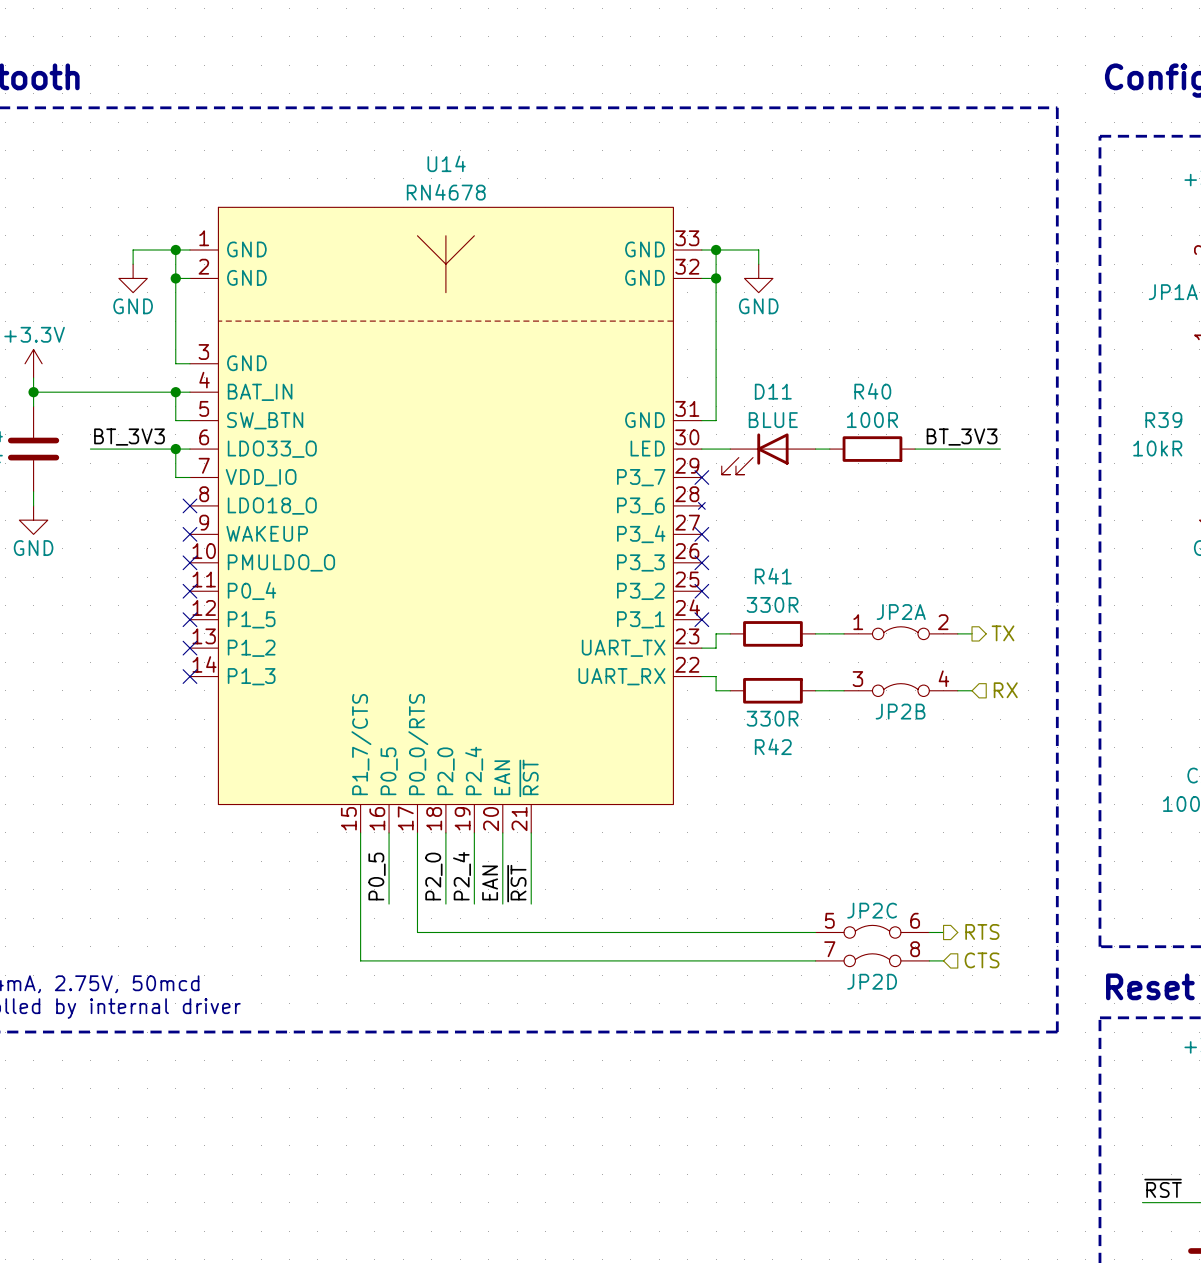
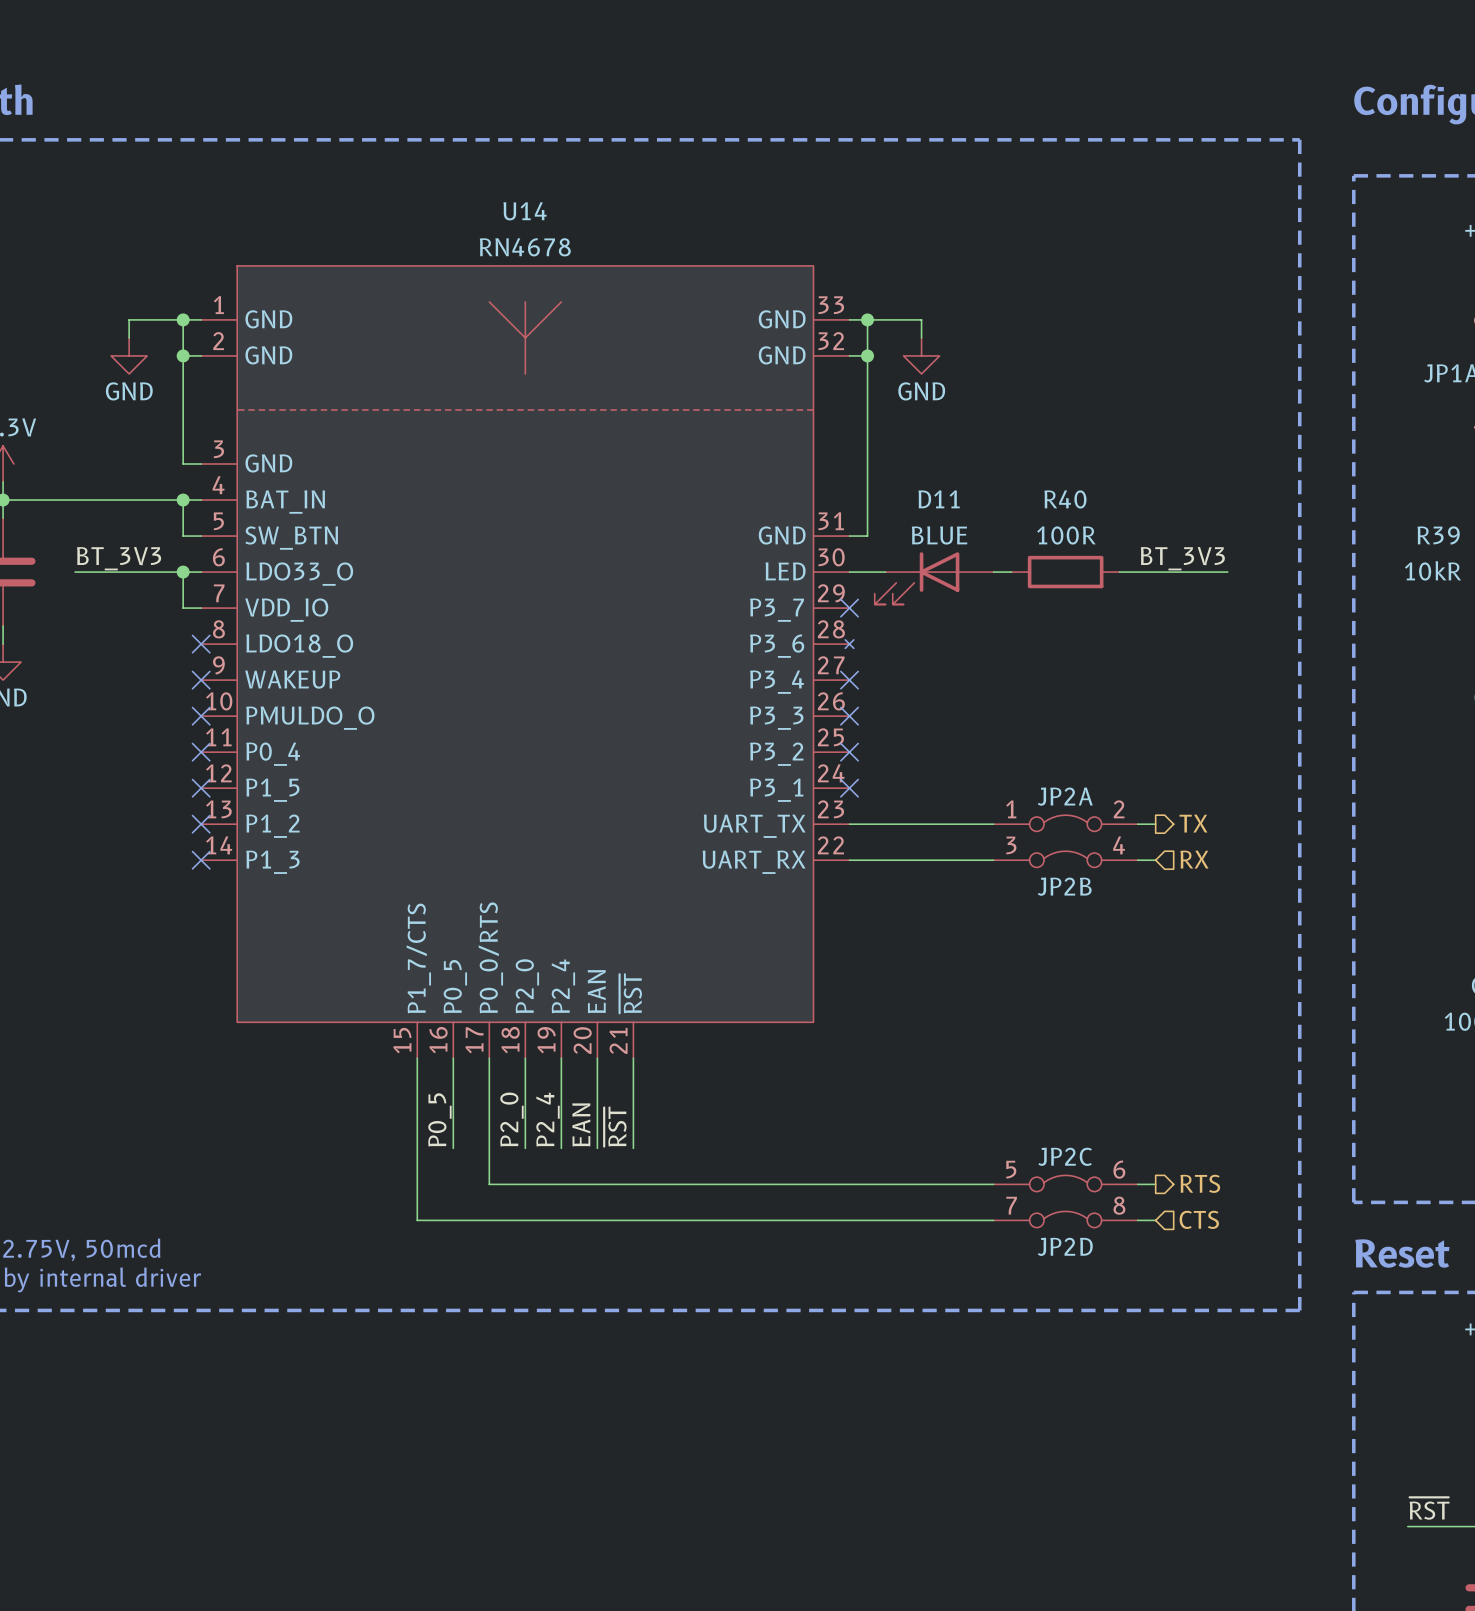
wire: (730, 633) (716, 633) (716, 648) -> (993, 824) (867, 824)
R41: 330R (772, 633) -> none
wire: (815, 633) (844, 633) -> none
JP2A position: (900, 633) -> (1065, 823)
wire: (957, 633) (972, 633) -> (1137, 824) (1155, 824)
hierarchical label position: TX (1003, 633) -> TX (1193, 823)
wire: (716, 676) (716, 690) (730, 690) -> (867, 860) (993, 860)
R42: 330R (772, 690) -> none
wire: (815, 690) (844, 690) -> none
JP2B position: (900, 690) -> (1065, 859)
wire: (957, 690) (972, 690) -> (1137, 860) (1155, 860)
hierarchical label position: RX (1005, 690) -> RX (1194, 859)

